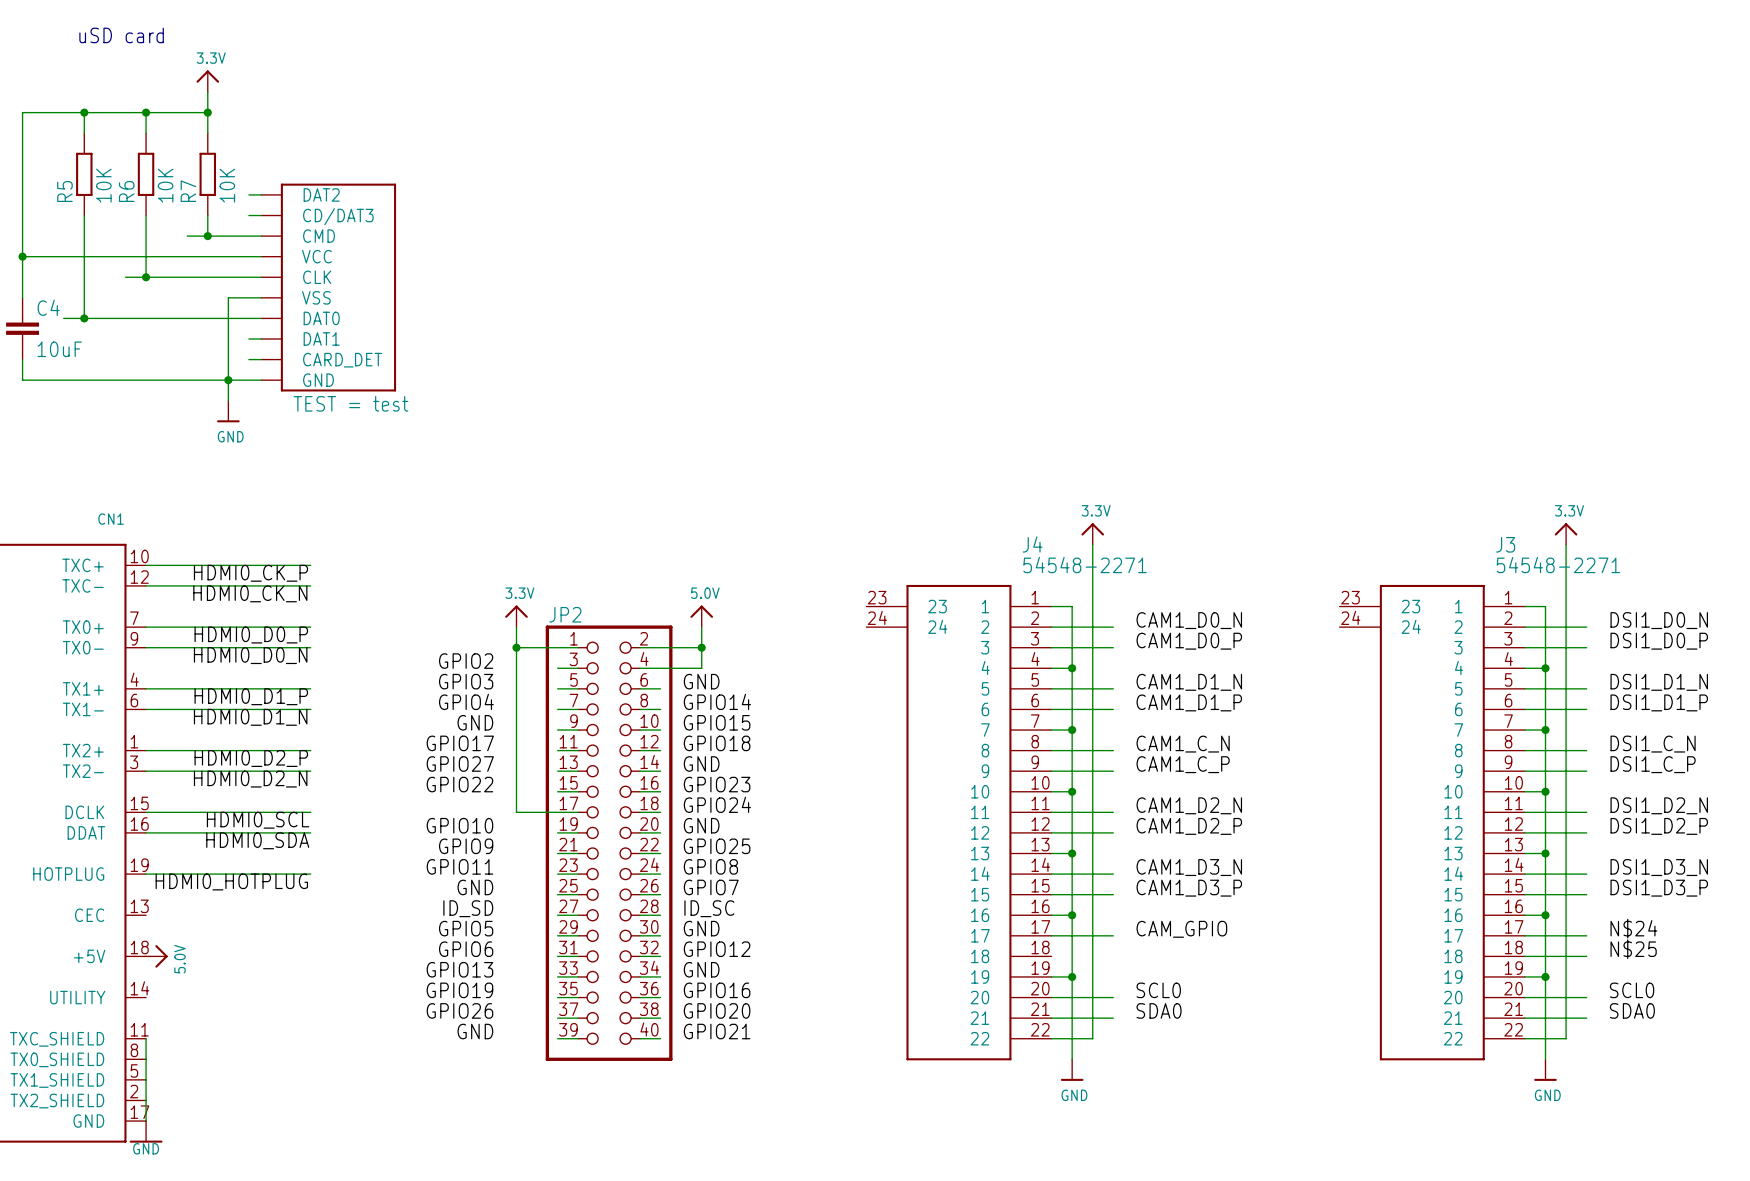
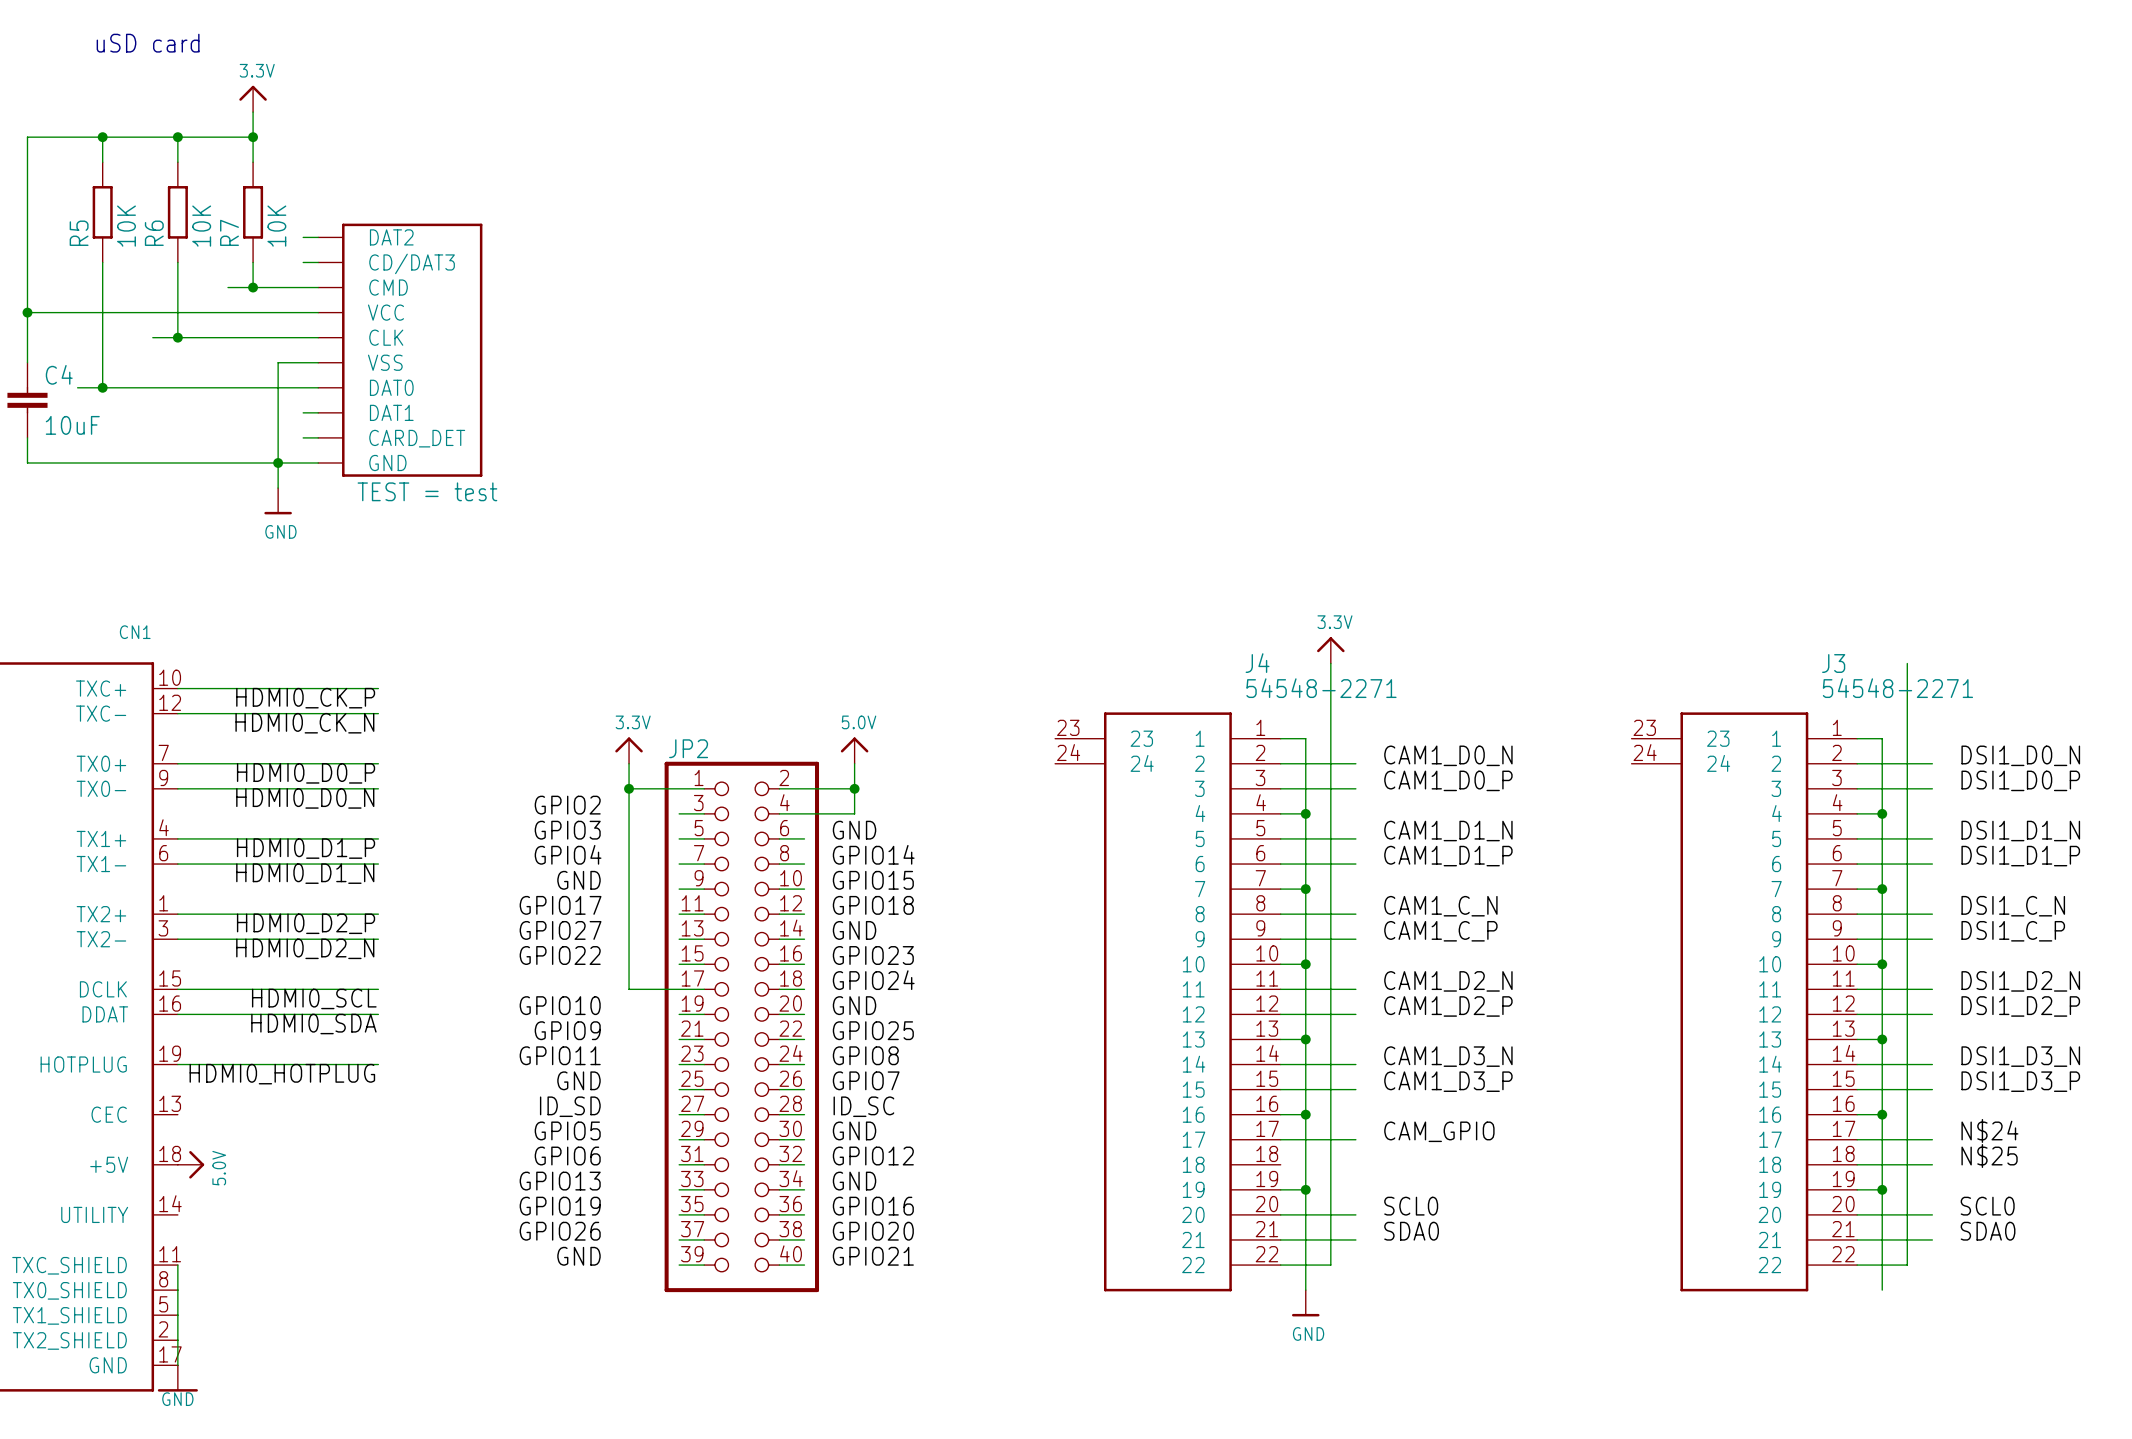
power symbol: 3.3V (1566, 533) -> none
power symbol: GND (1545, 1070) -> none

